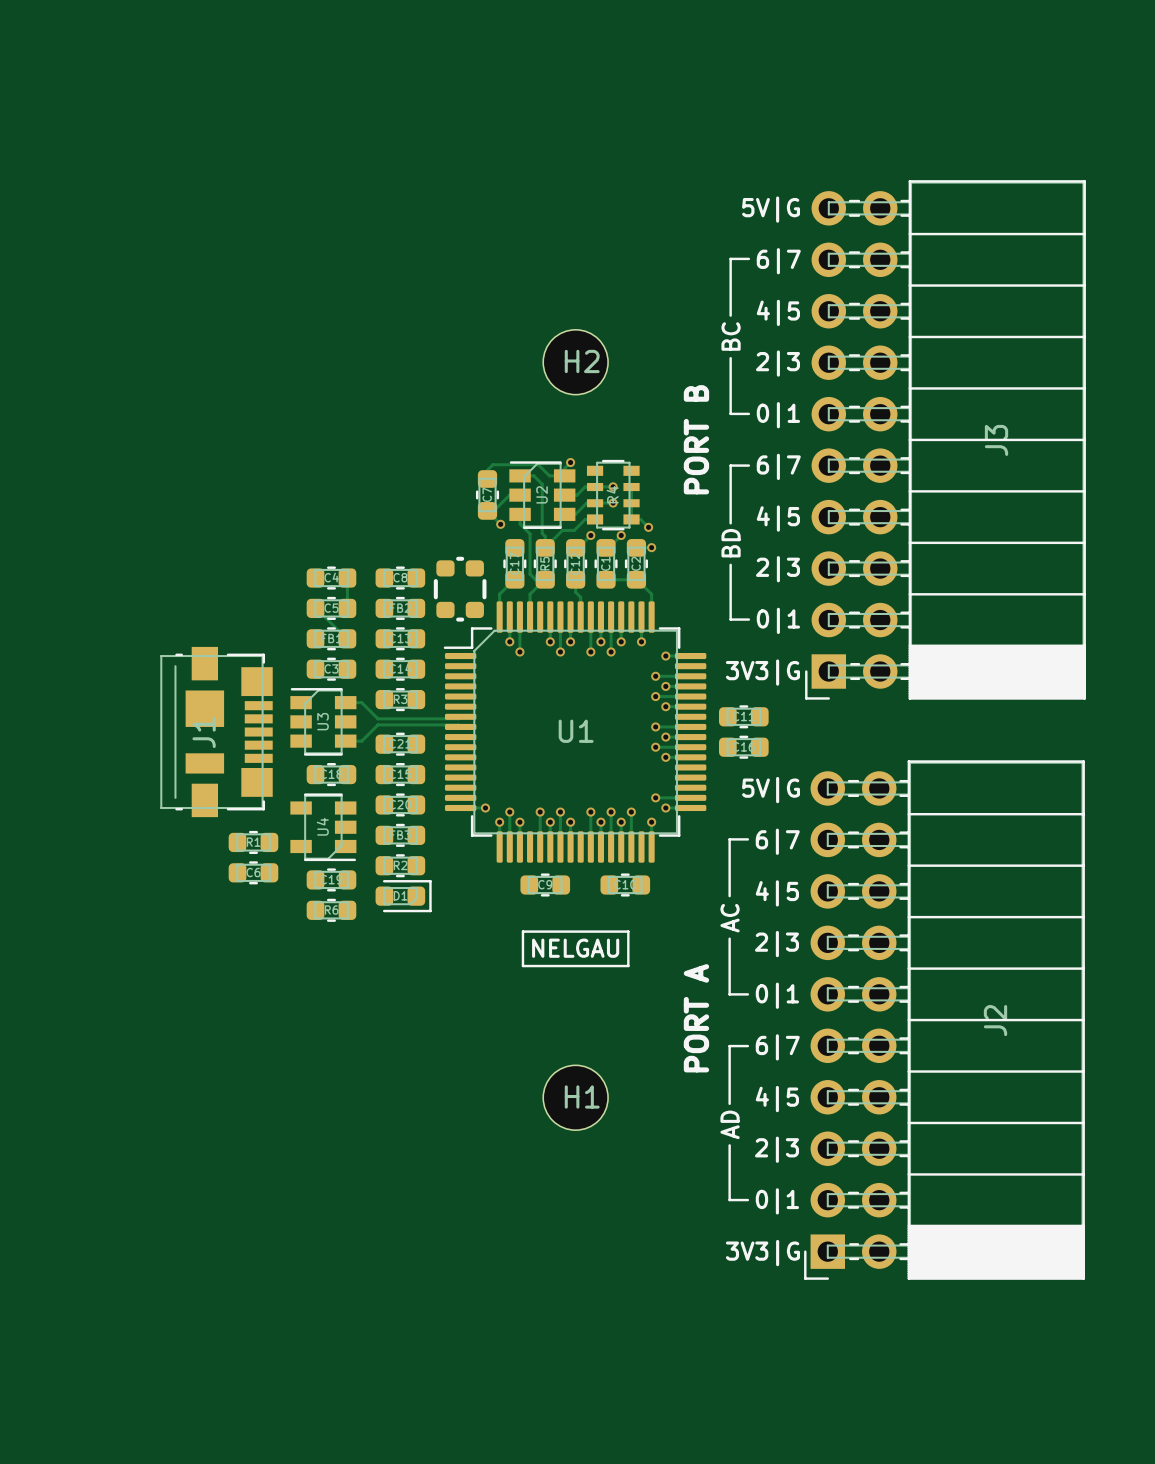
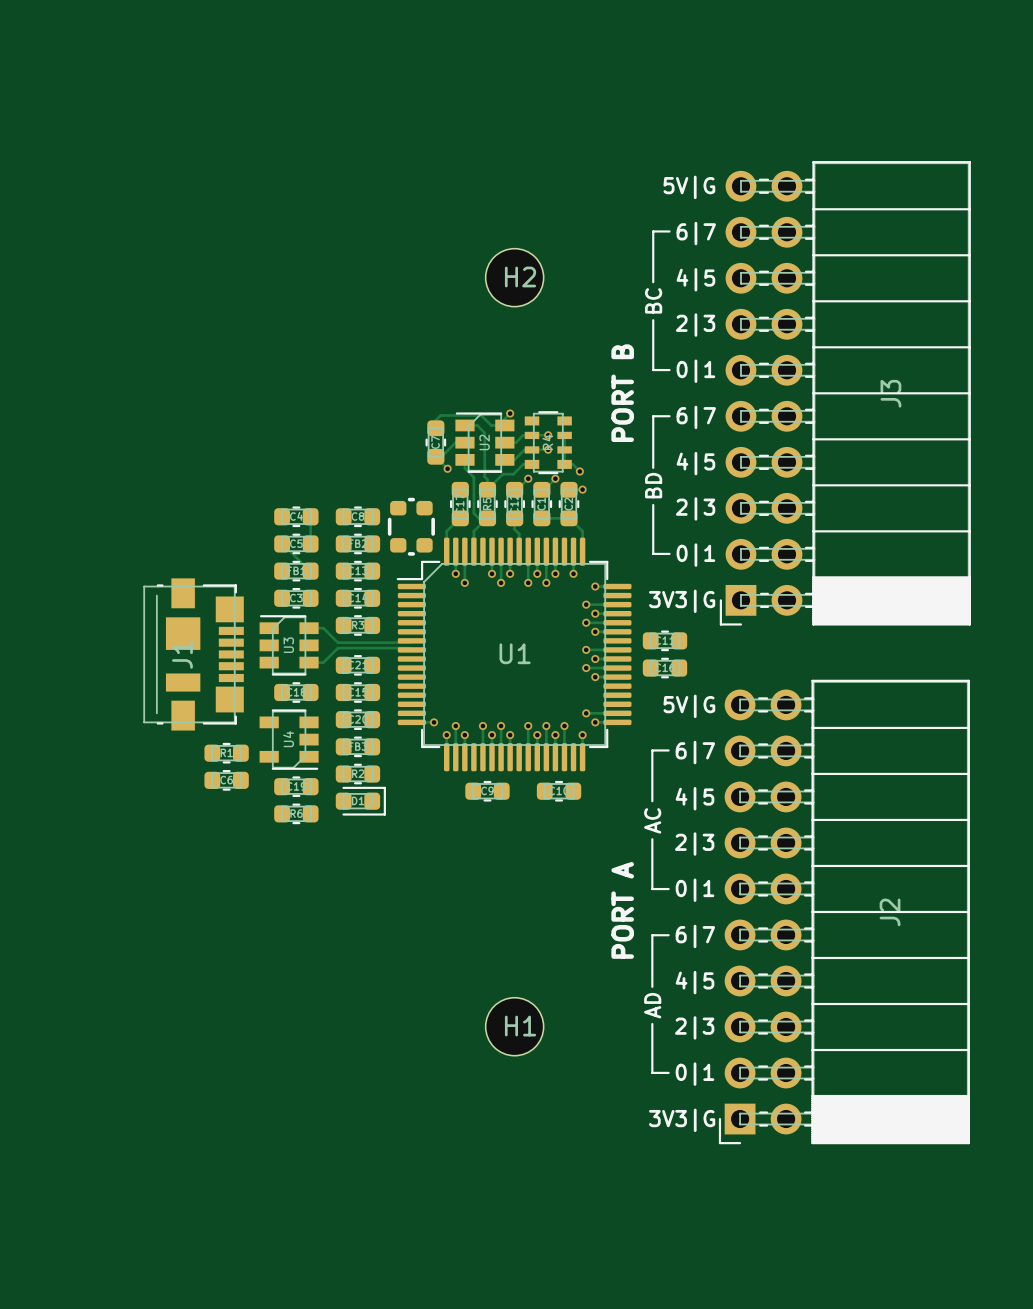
H2 position: (575, 362) -> (514, 277)
drawing: [521, 930, 630, 968] -> none
H1 position: (575, 1097) -> (514, 1026)

